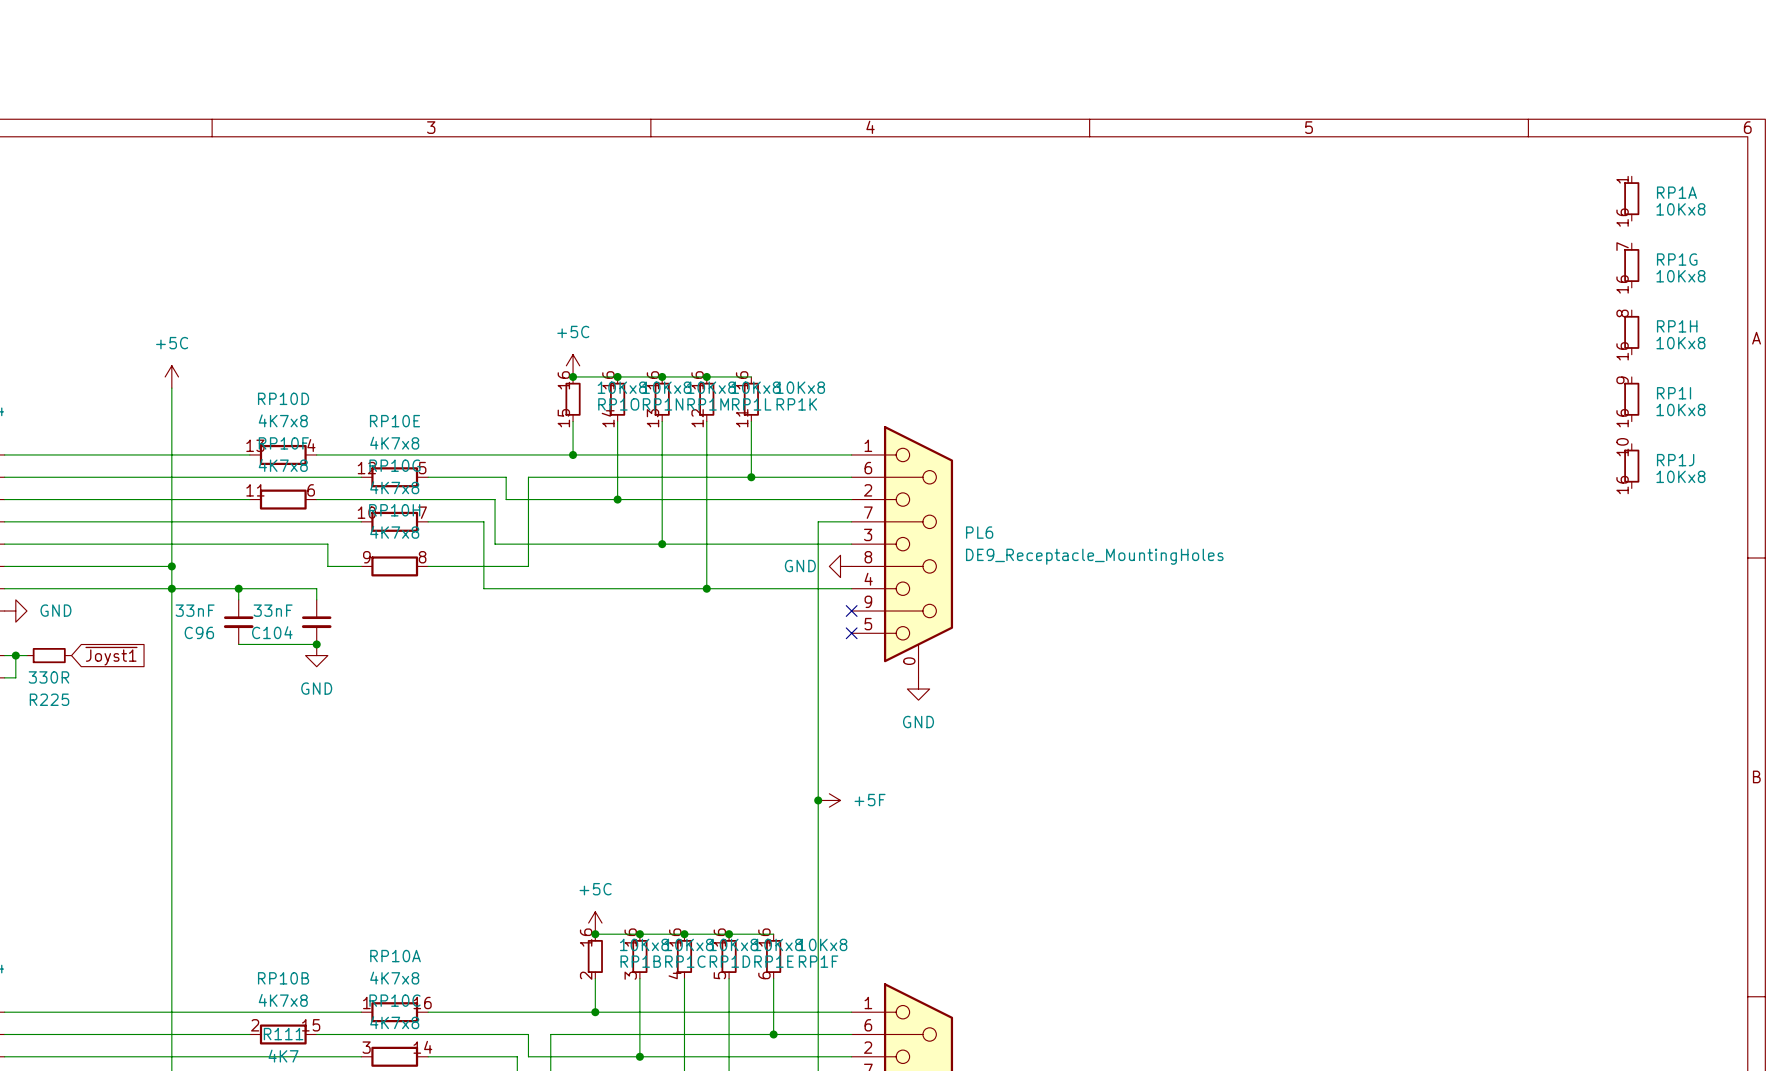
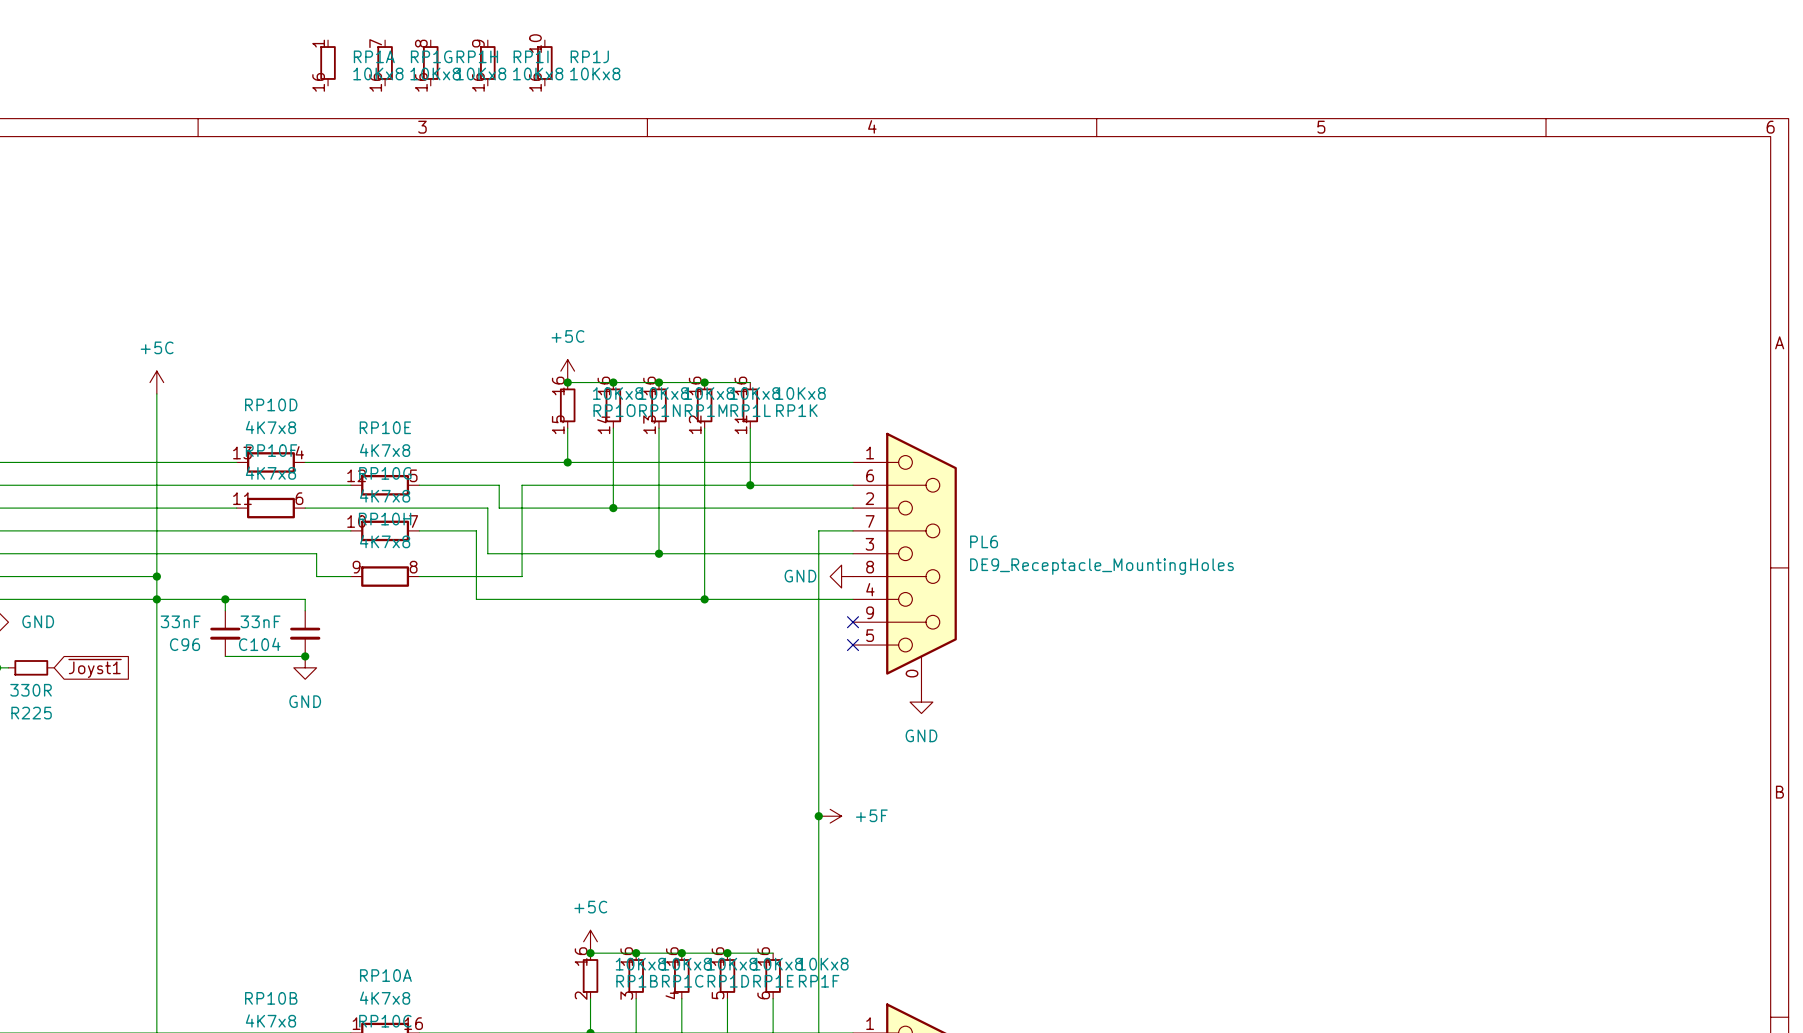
RP1A position: (1631, 198) -> (328, 62)
RP1G position: (1631, 265) -> (385, 62)
RP1H position: (1631, 332) -> (430, 62)
RP1I position: (1631, 399) -> (487, 62)
RP1J position: (1631, 466) -> (544, 62)

